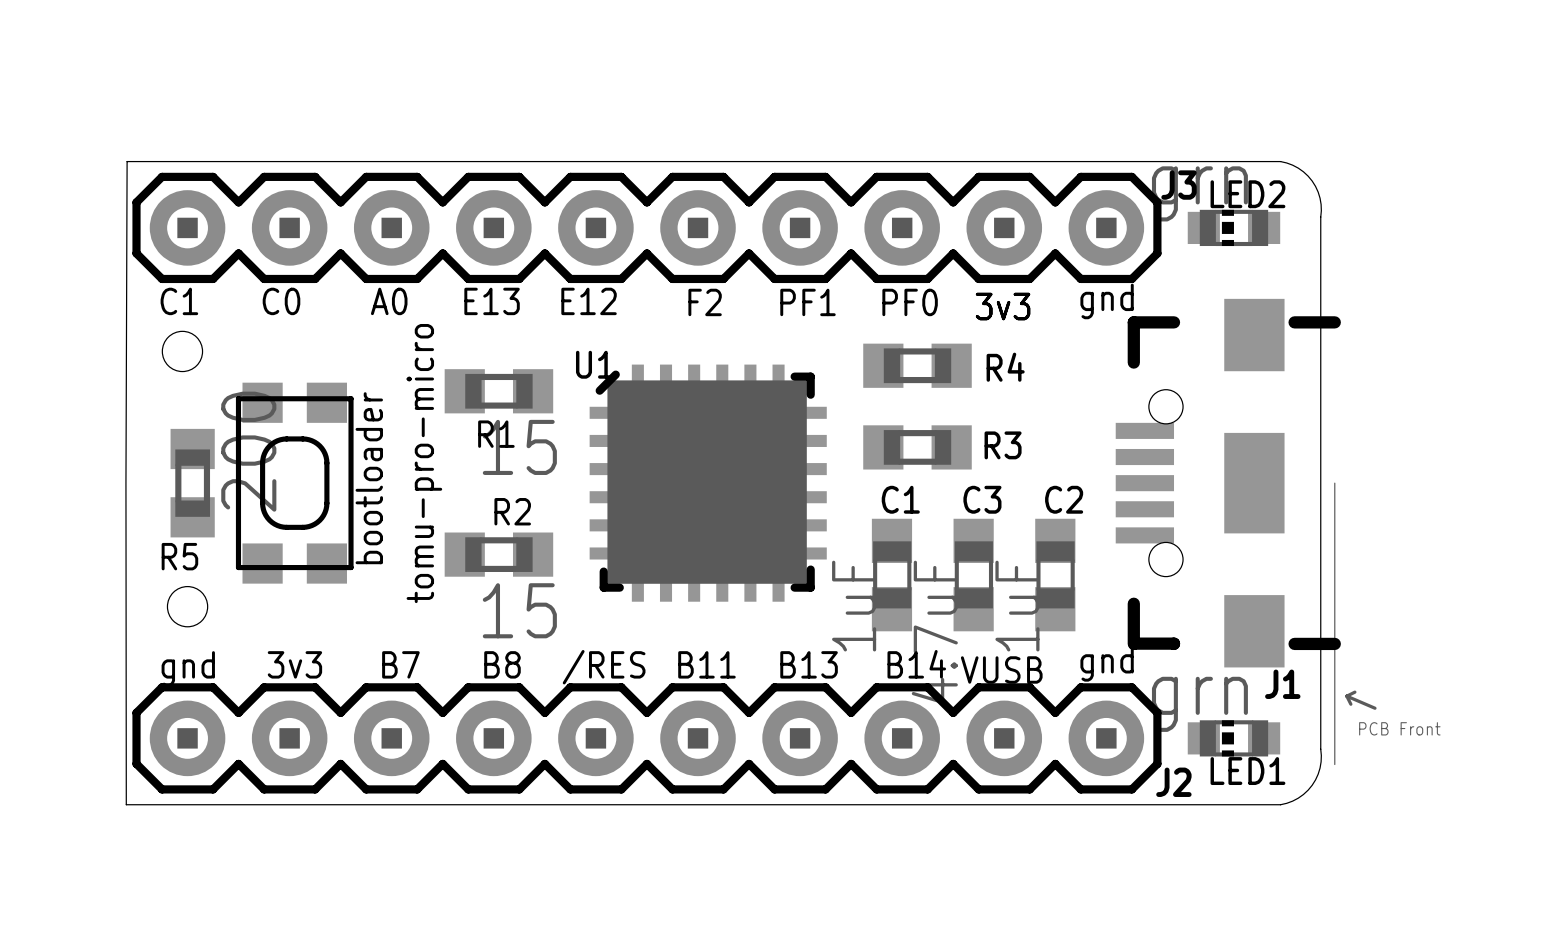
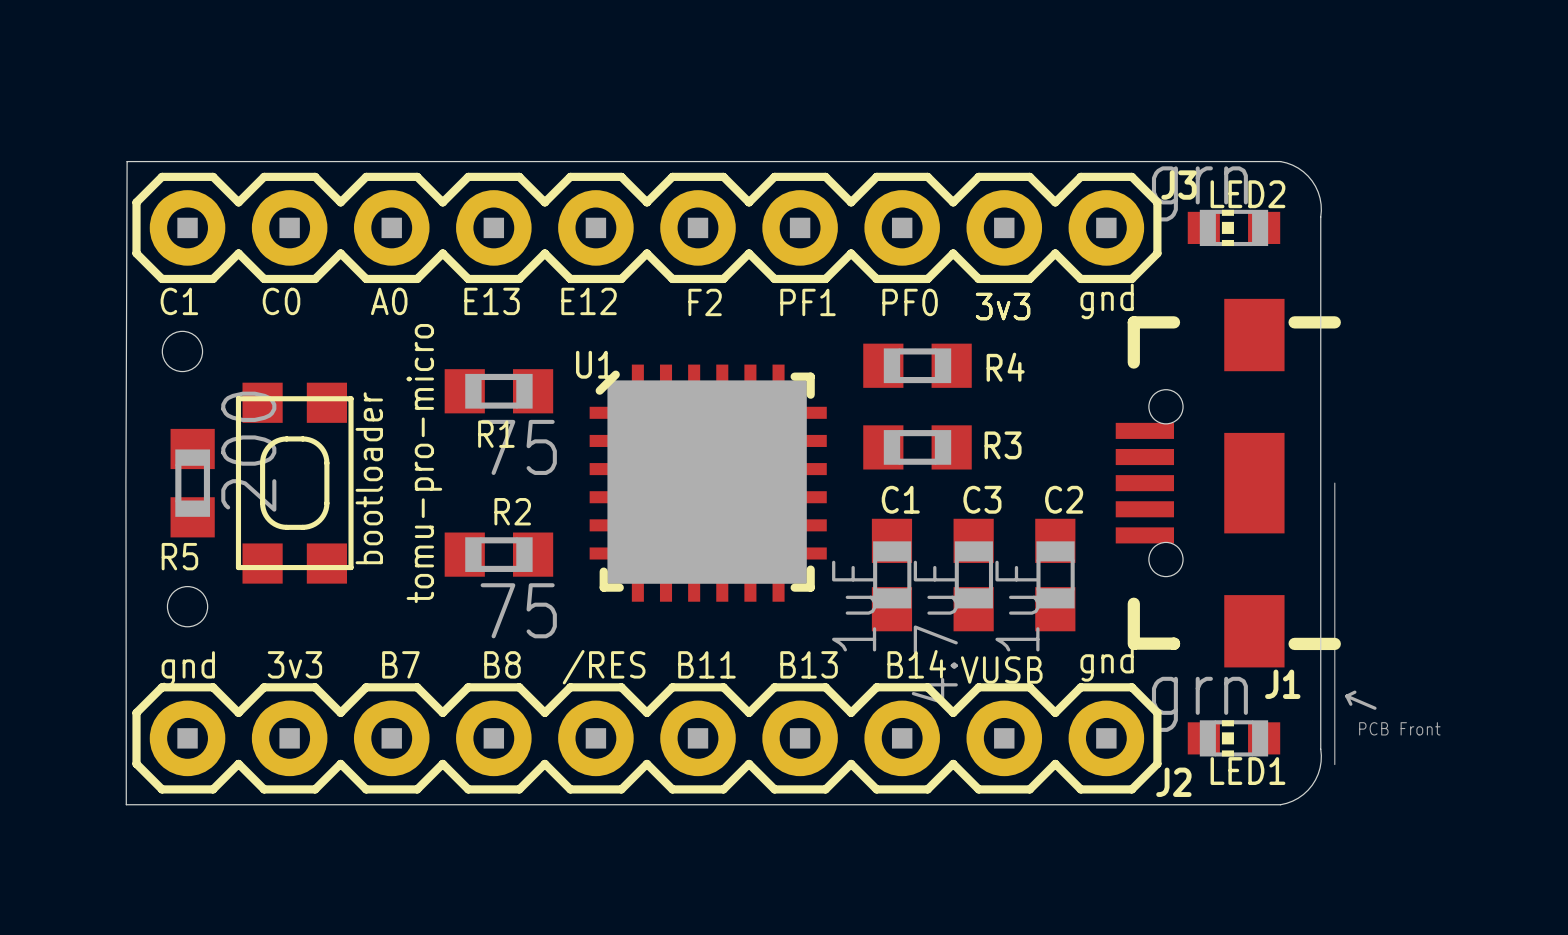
R1 value: 15 (519, 447) -> 75 (518, 447)
R2 value: 15 (519, 610) -> 75 (518, 610)

